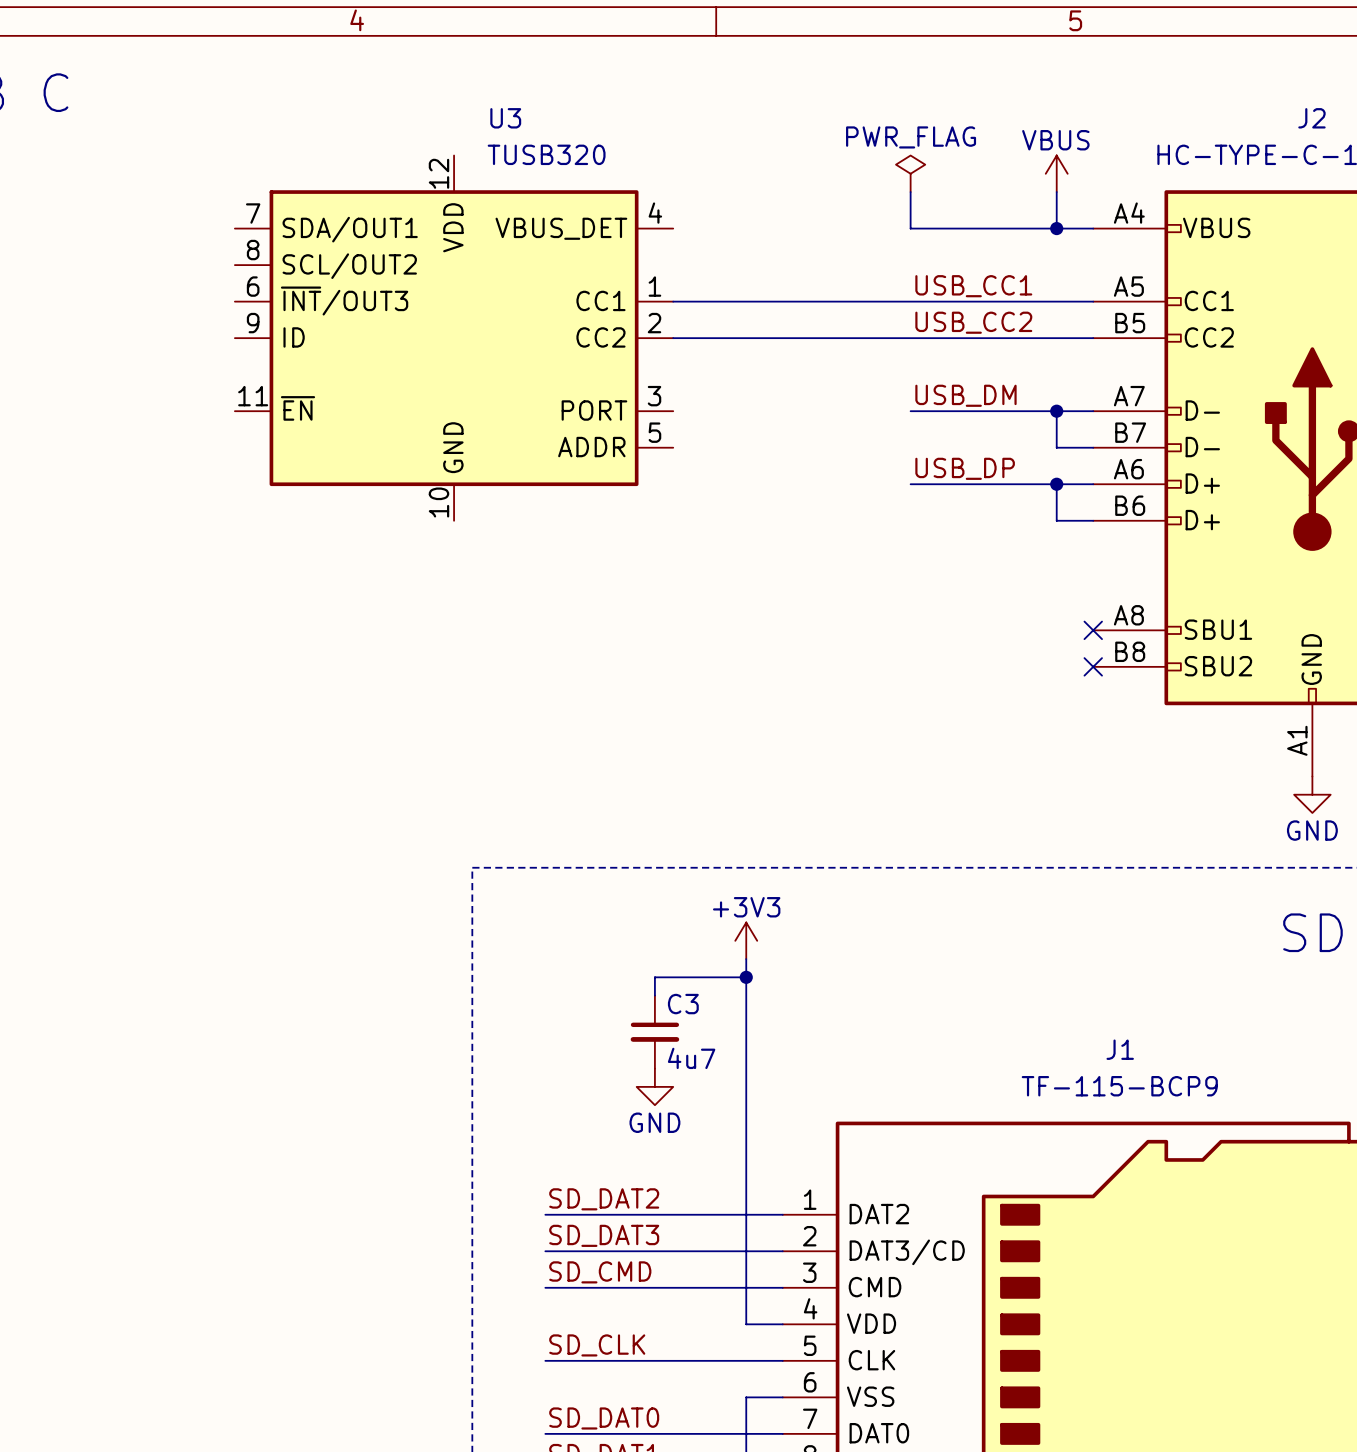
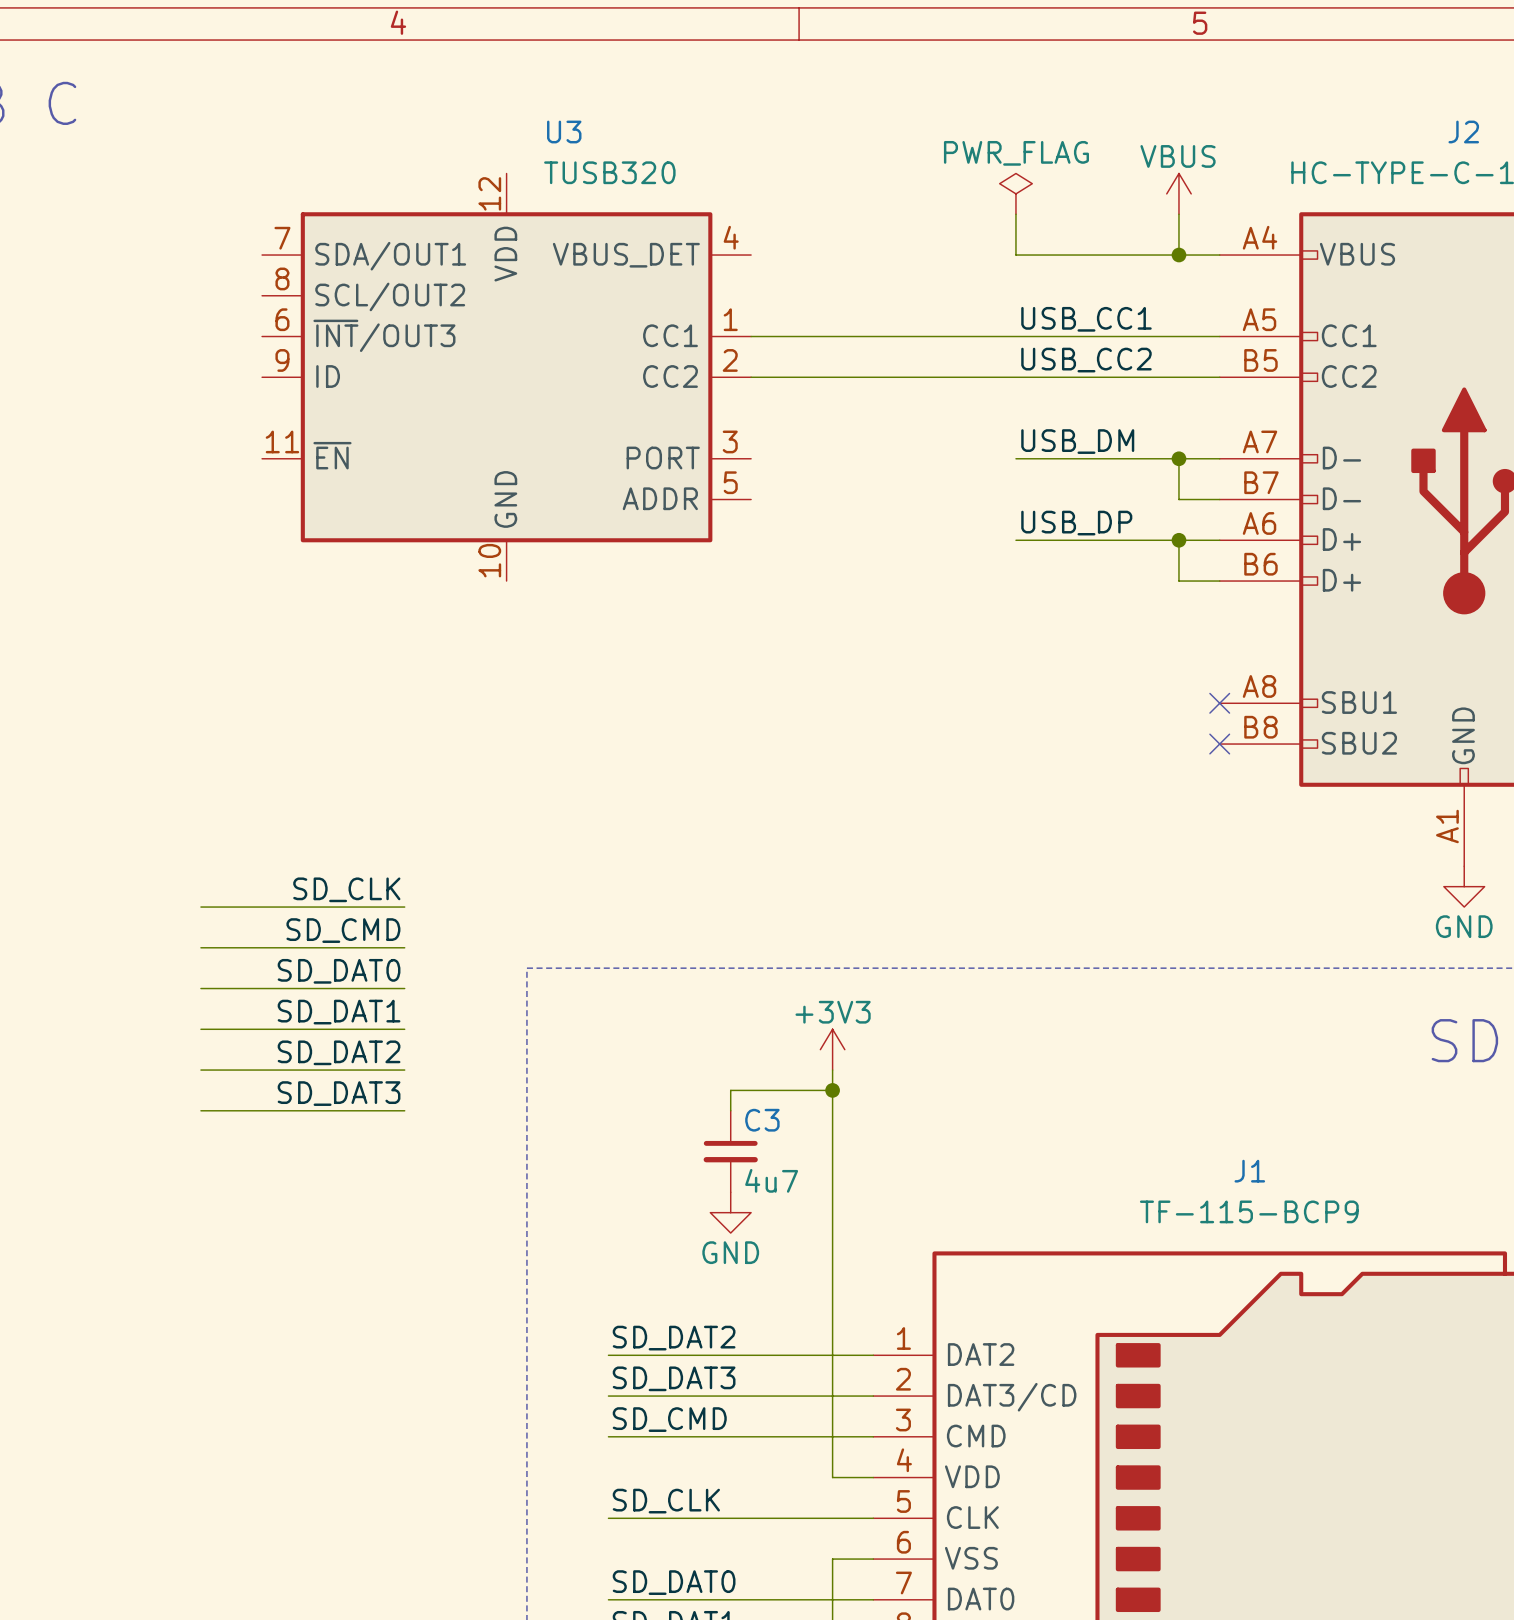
label: none -> SD_CLK (346, 889)
wire: none -> (200, 907) (404, 907)
label: none -> SD_CMD (343, 930)
wire: none -> (200, 947) (404, 947)
label: none -> SD_DAT0 (339, 971)
wire: none -> (200, 988) (404, 988)
label: none -> SD_DAT1 (339, 1012)
wire: none -> (200, 1029) (404, 1029)
label: none -> SD_DAT2 (339, 1052)
wire: none -> (200, 1070) (404, 1070)
label: none -> SD_DAT3 (339, 1093)
wire: none -> (200, 1110) (404, 1110)

